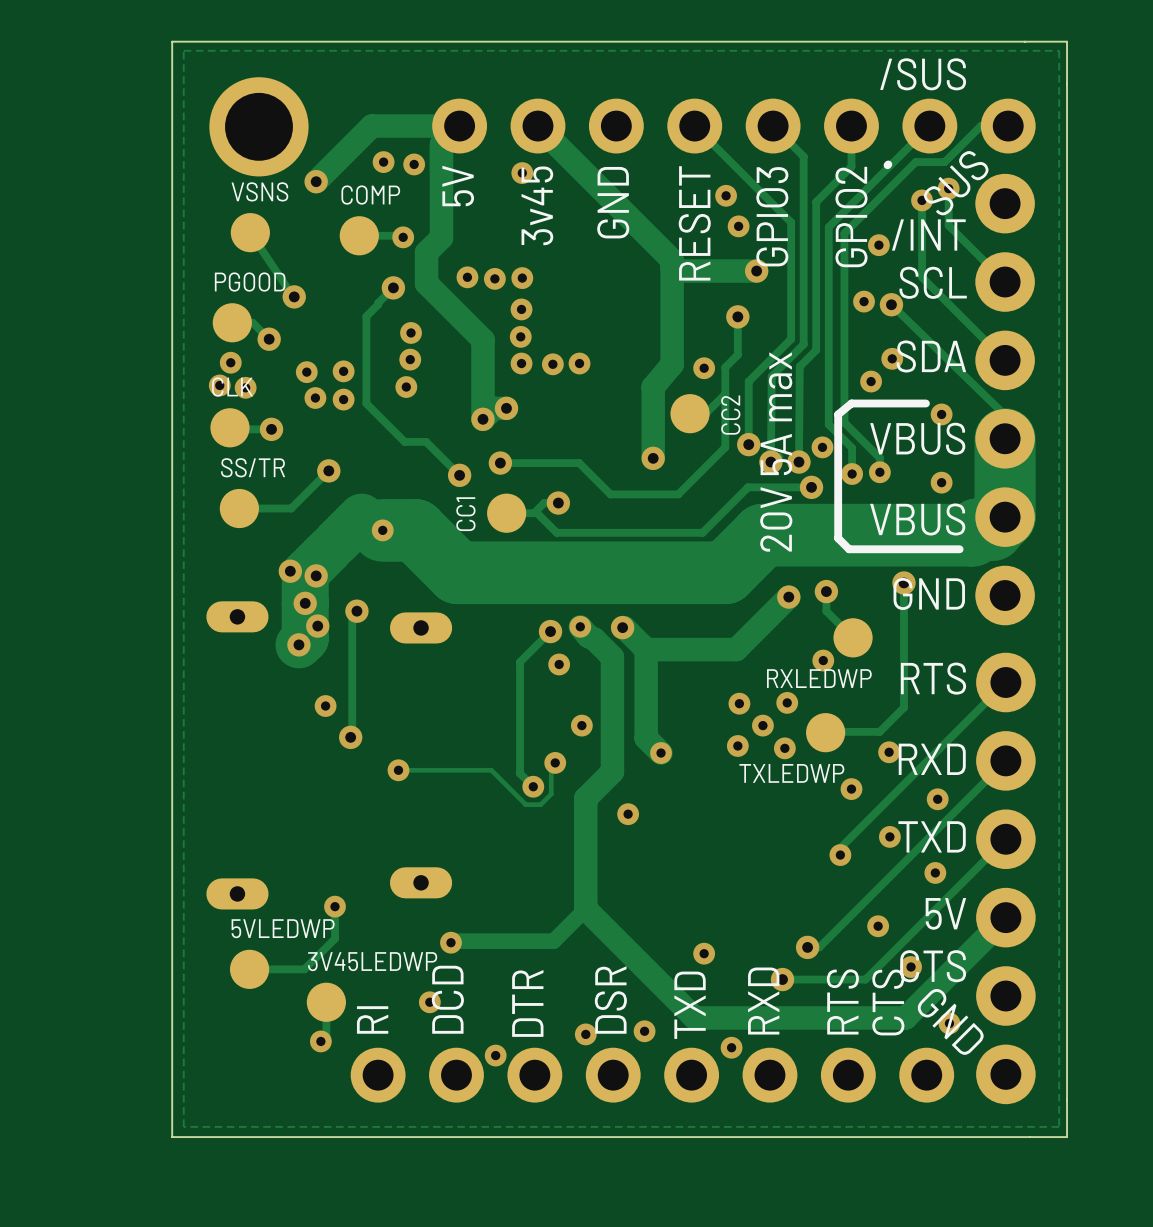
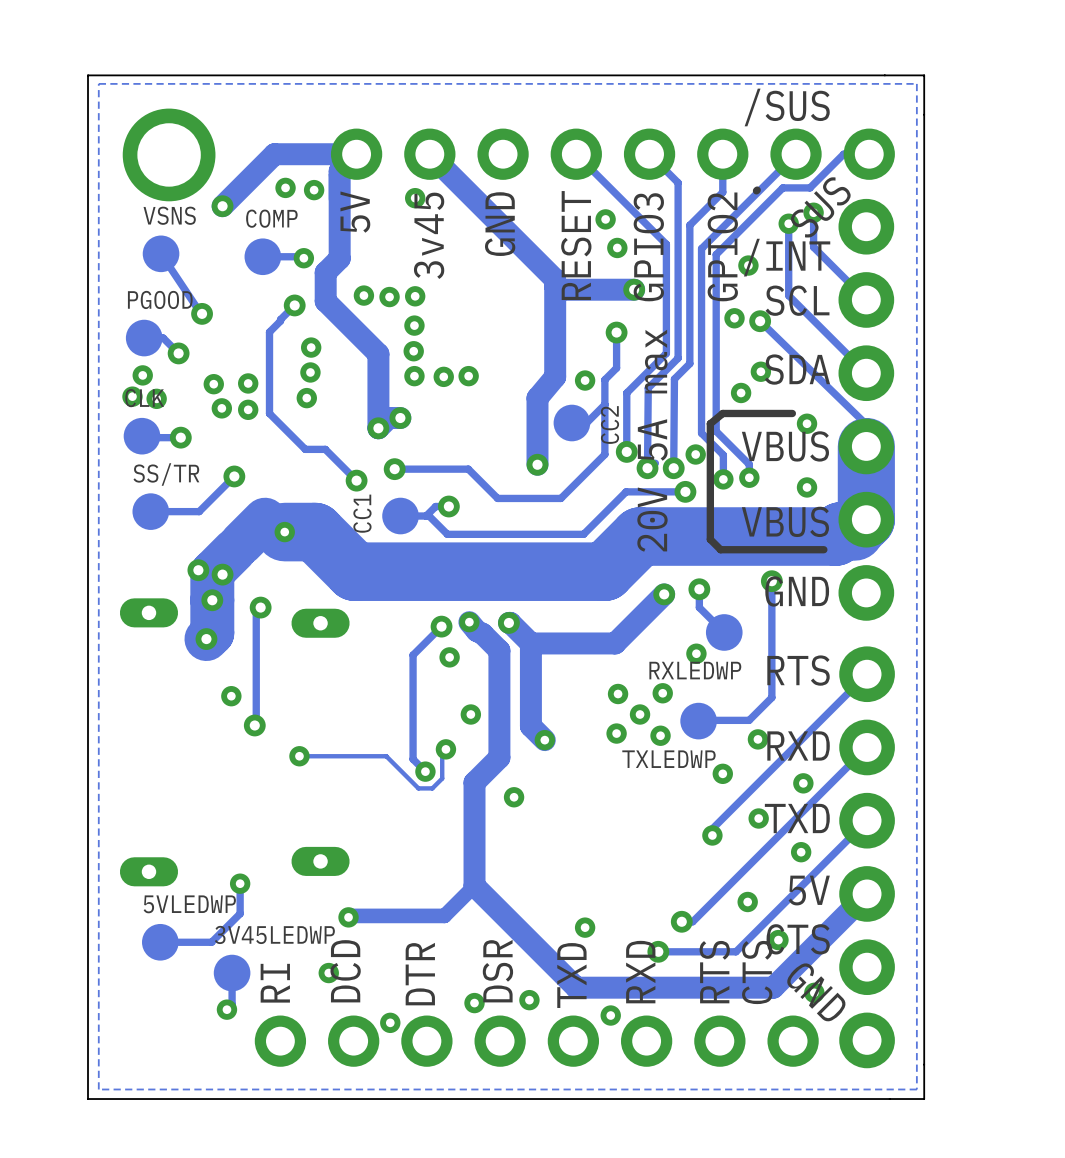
via: (317, 626) -> none

